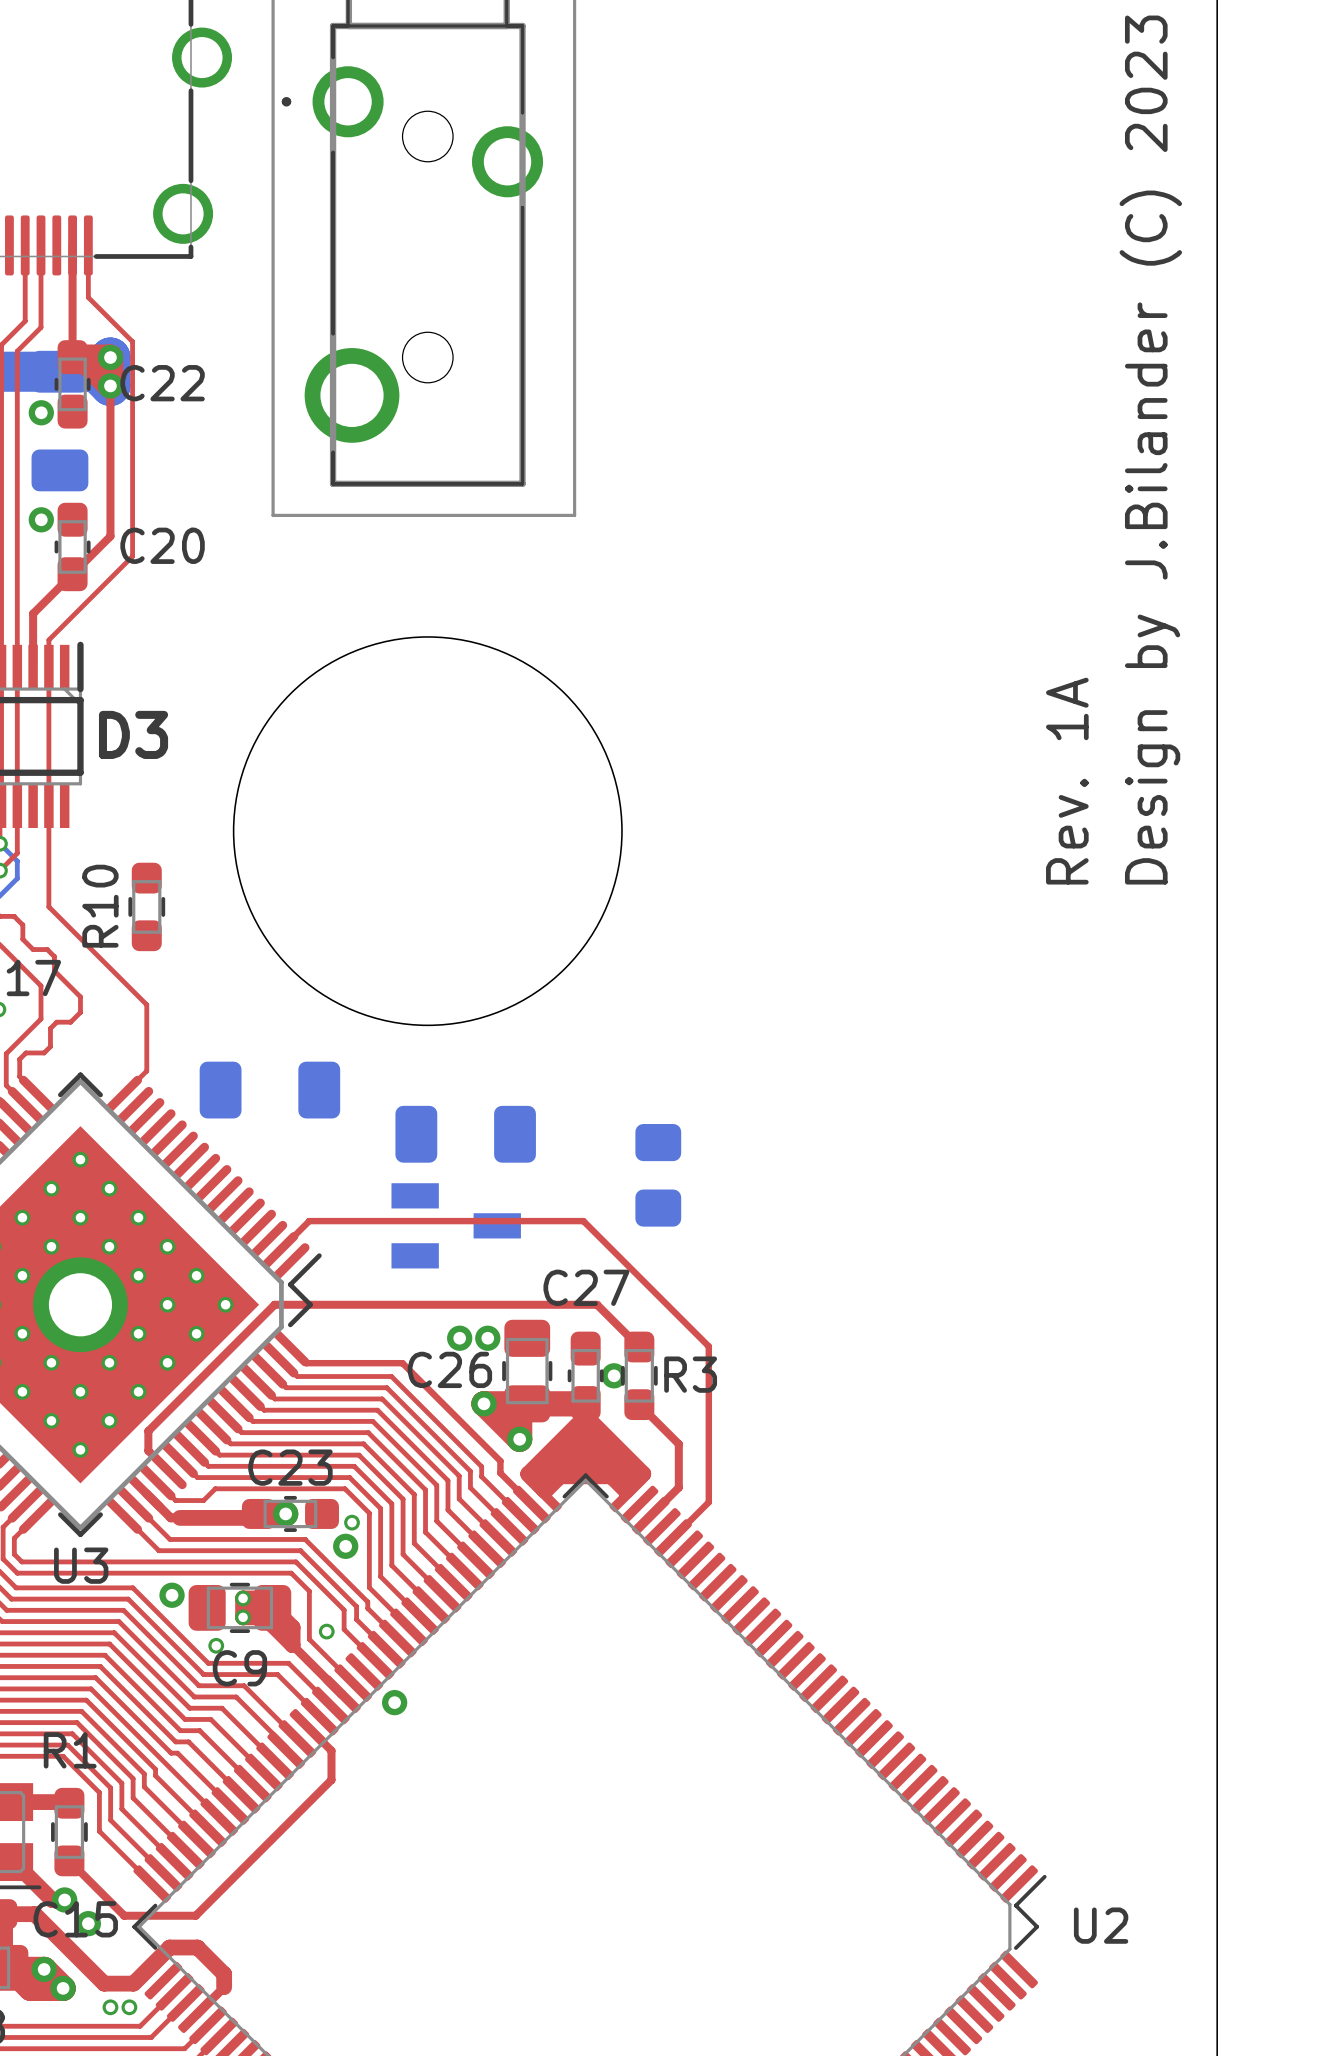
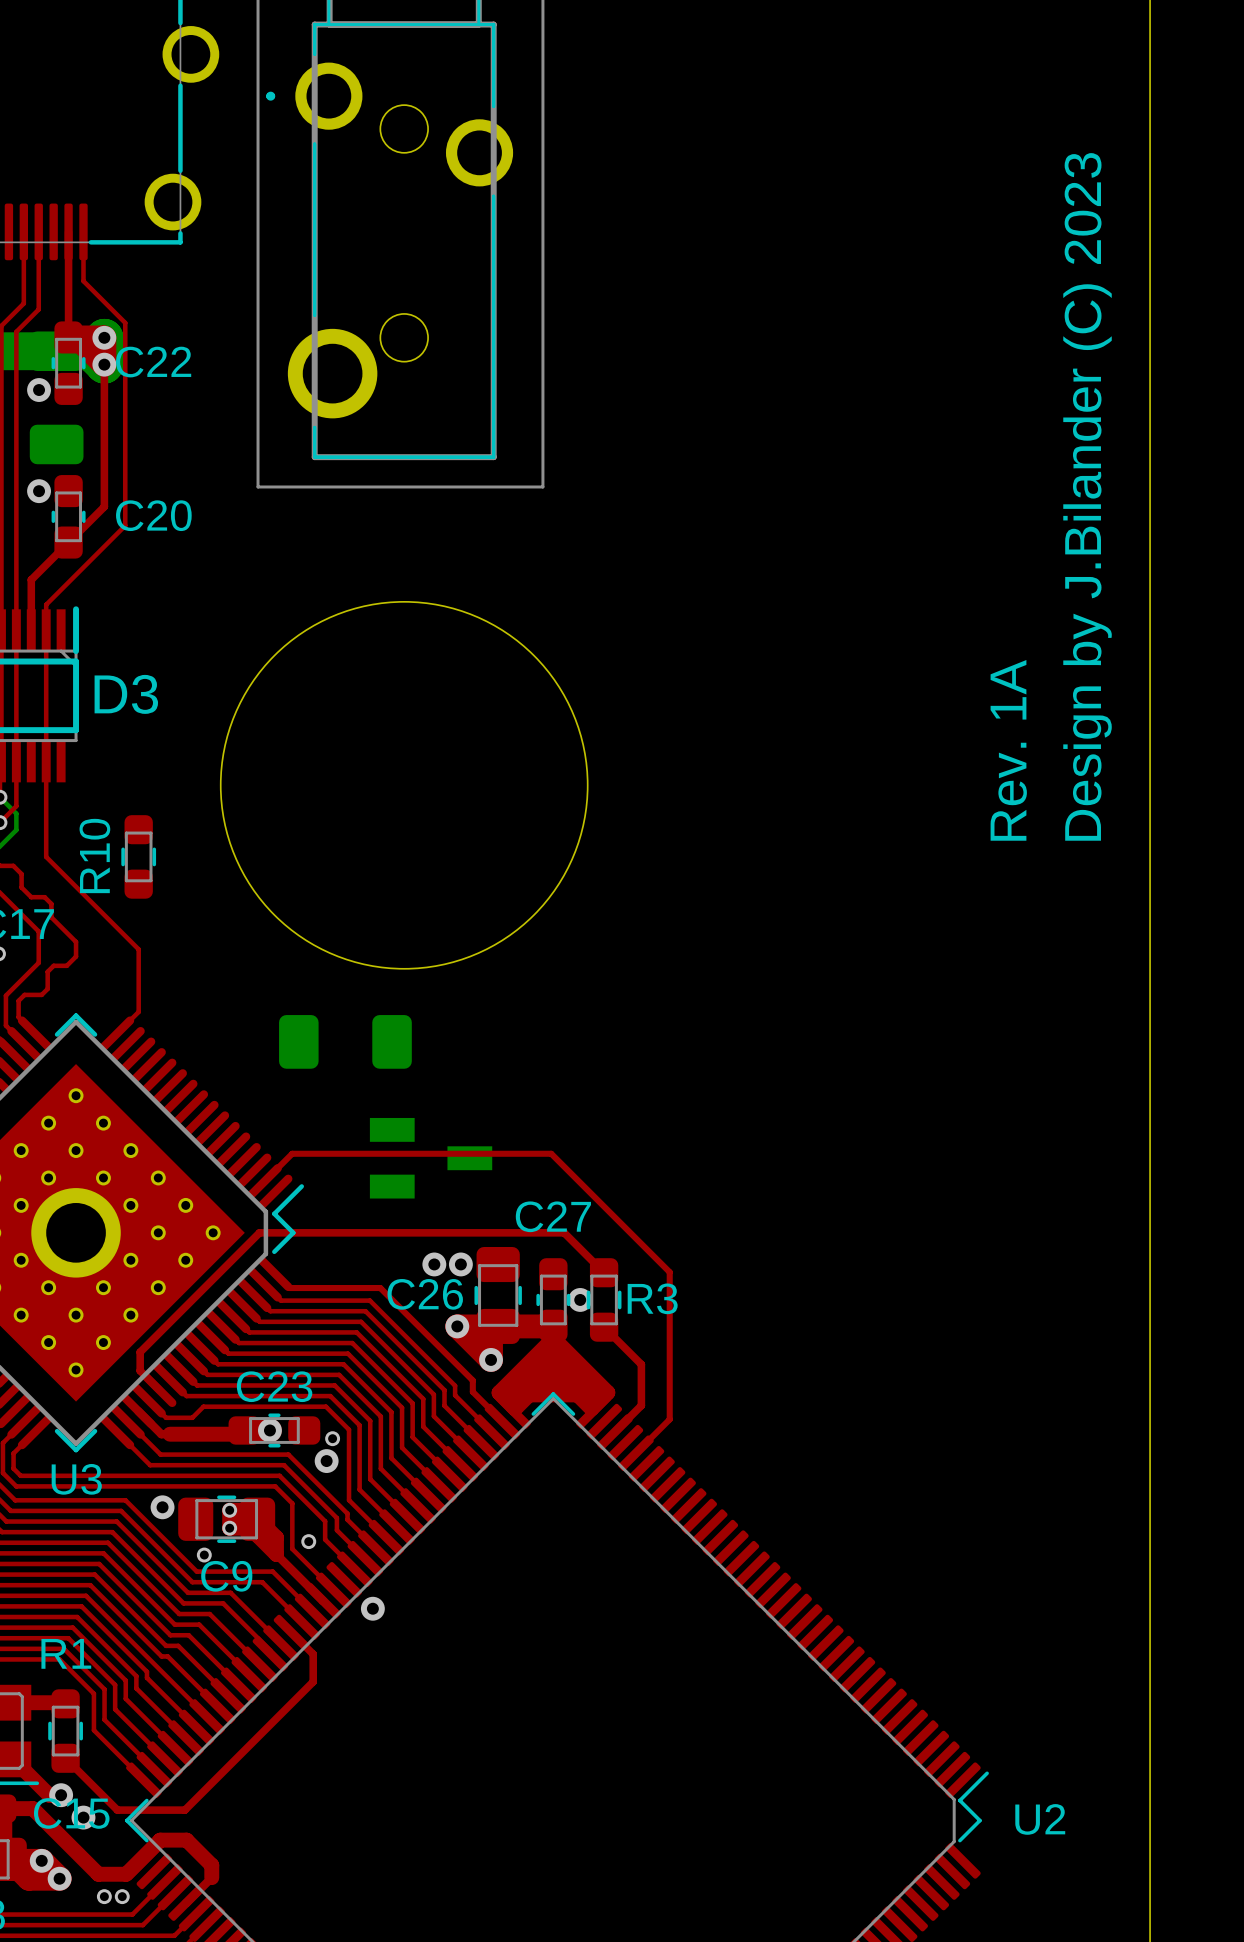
part: (269, 1090) -> none
part: none -> (345, 1041)
part: (465, 1134) -> none
part: (658, 1175) -> none

